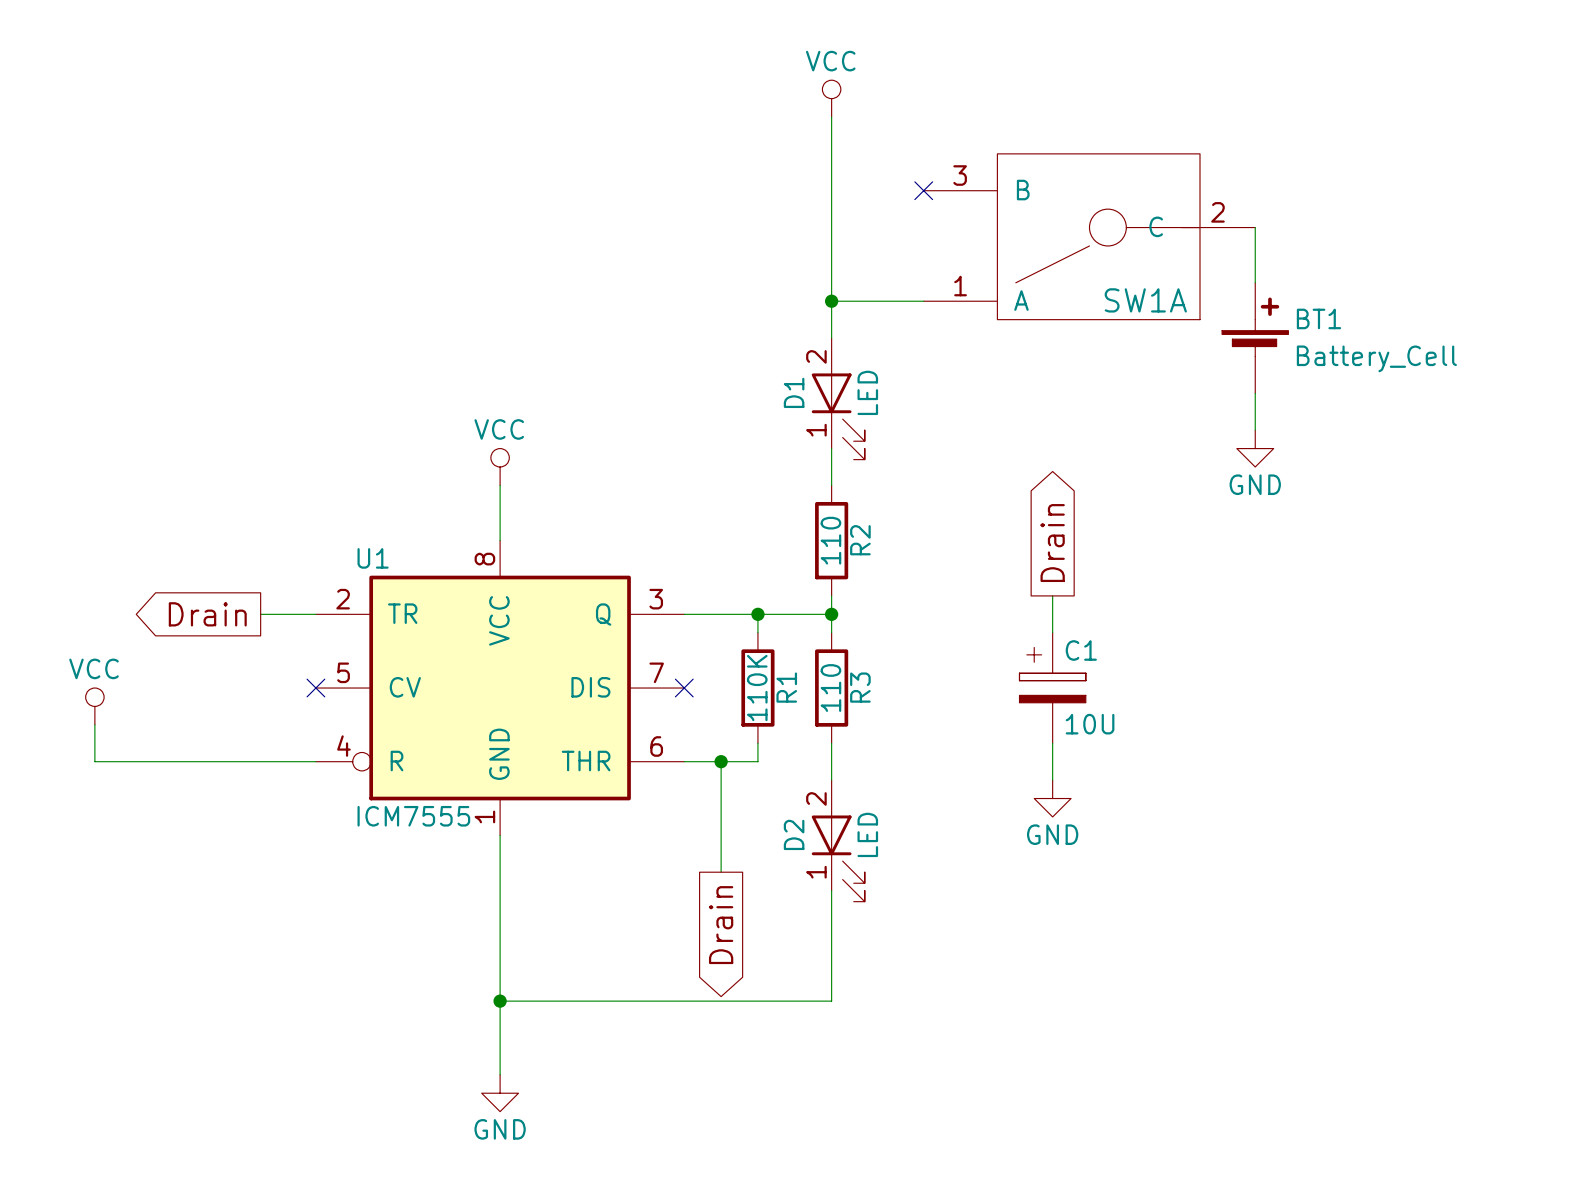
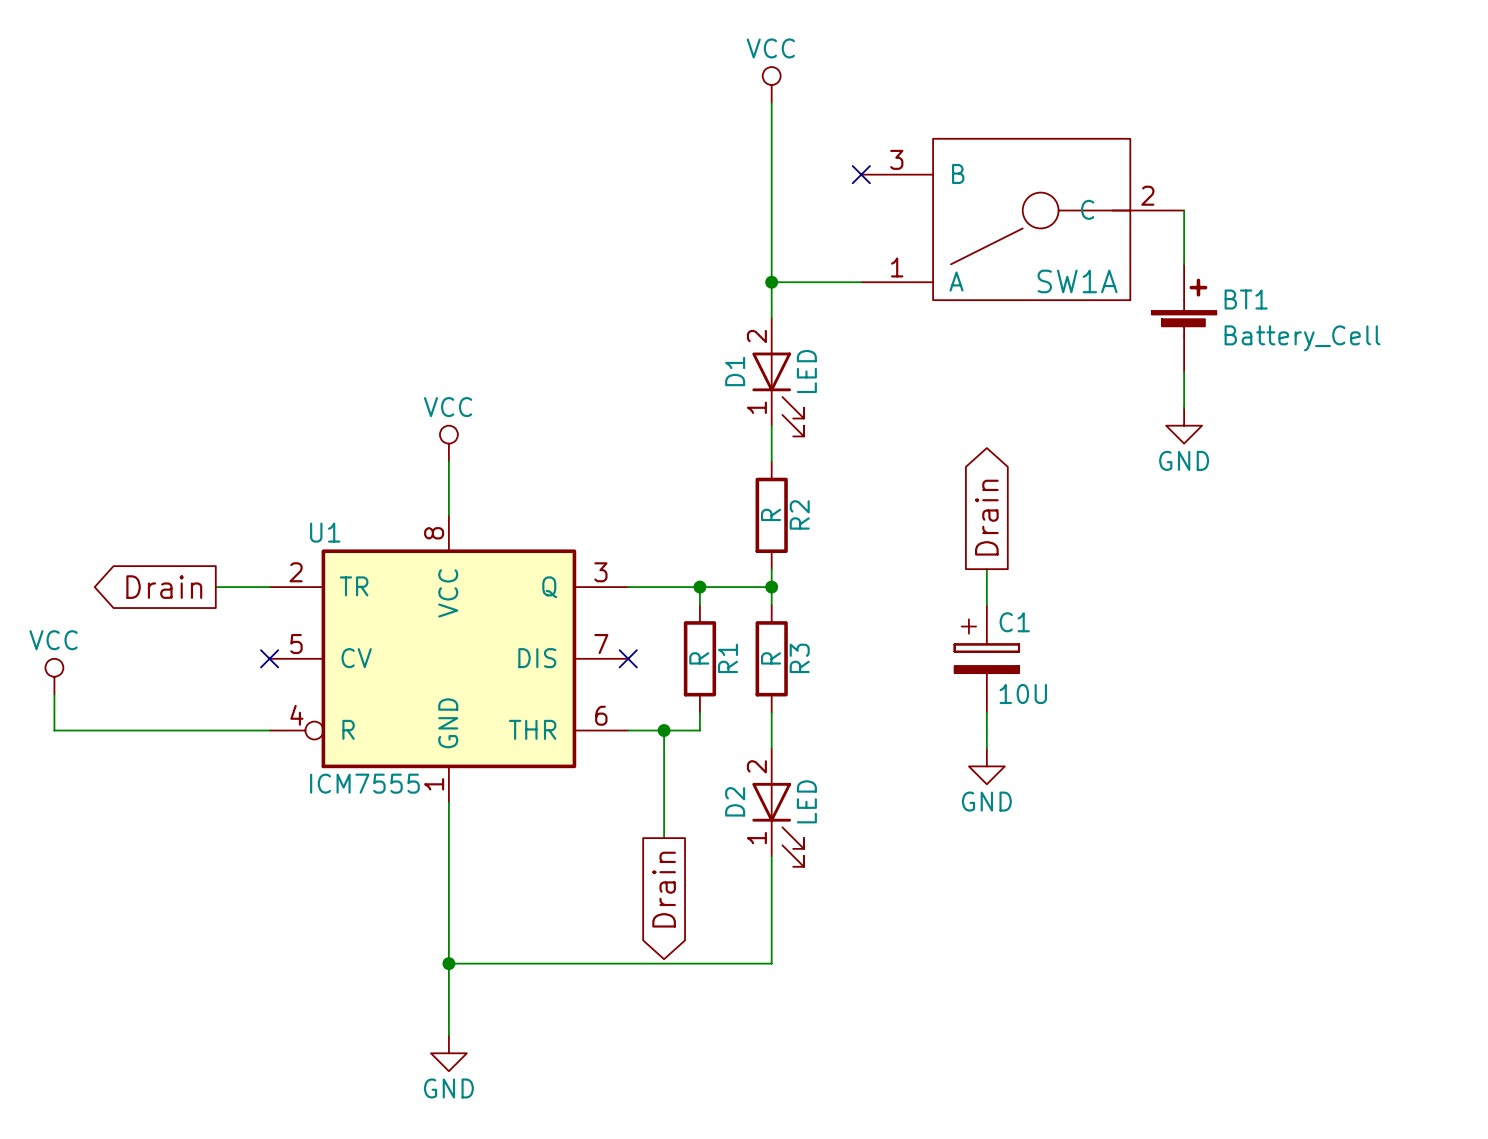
R2 value: 110 (830, 540) -> R (771, 514)
R1 value: 110K (757, 688) -> R (699, 658)
R3 value: 110 (830, 688) -> R (771, 658)

